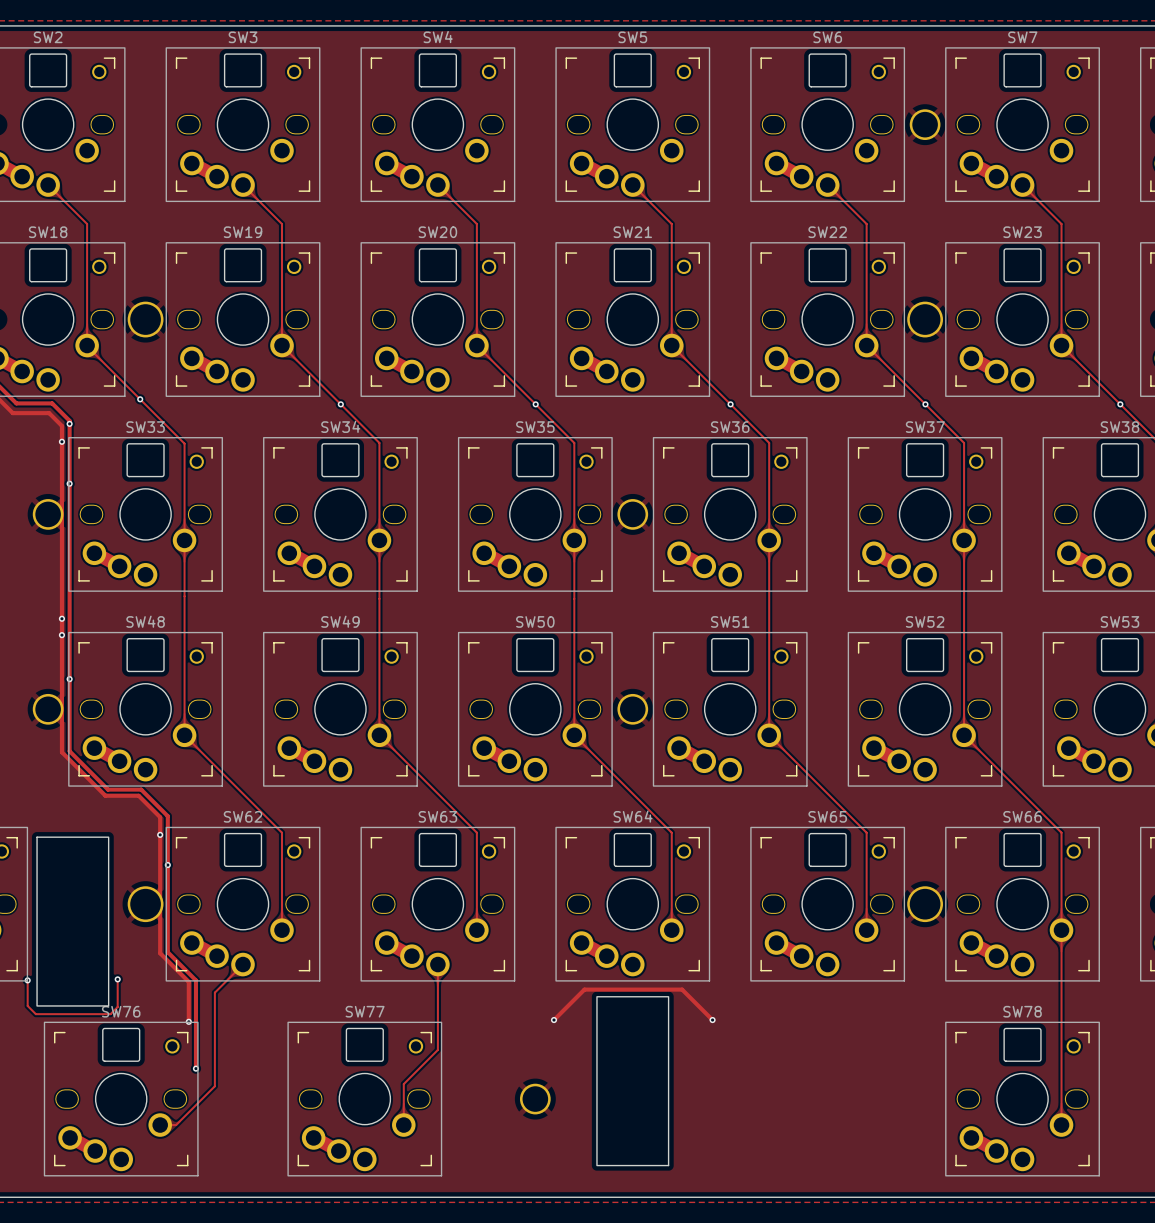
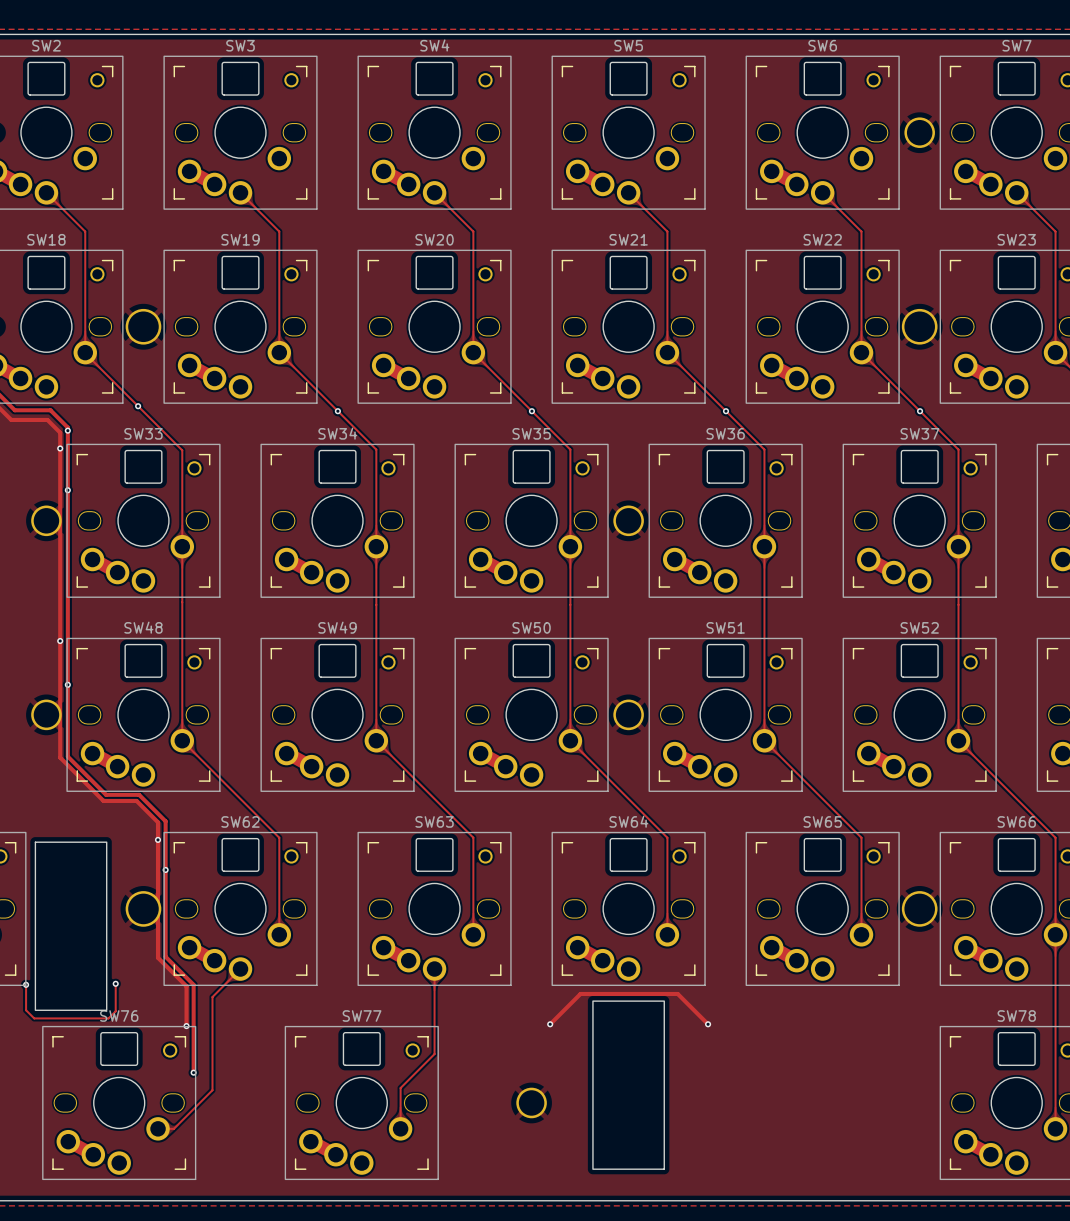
via: (61, 618) -> none

